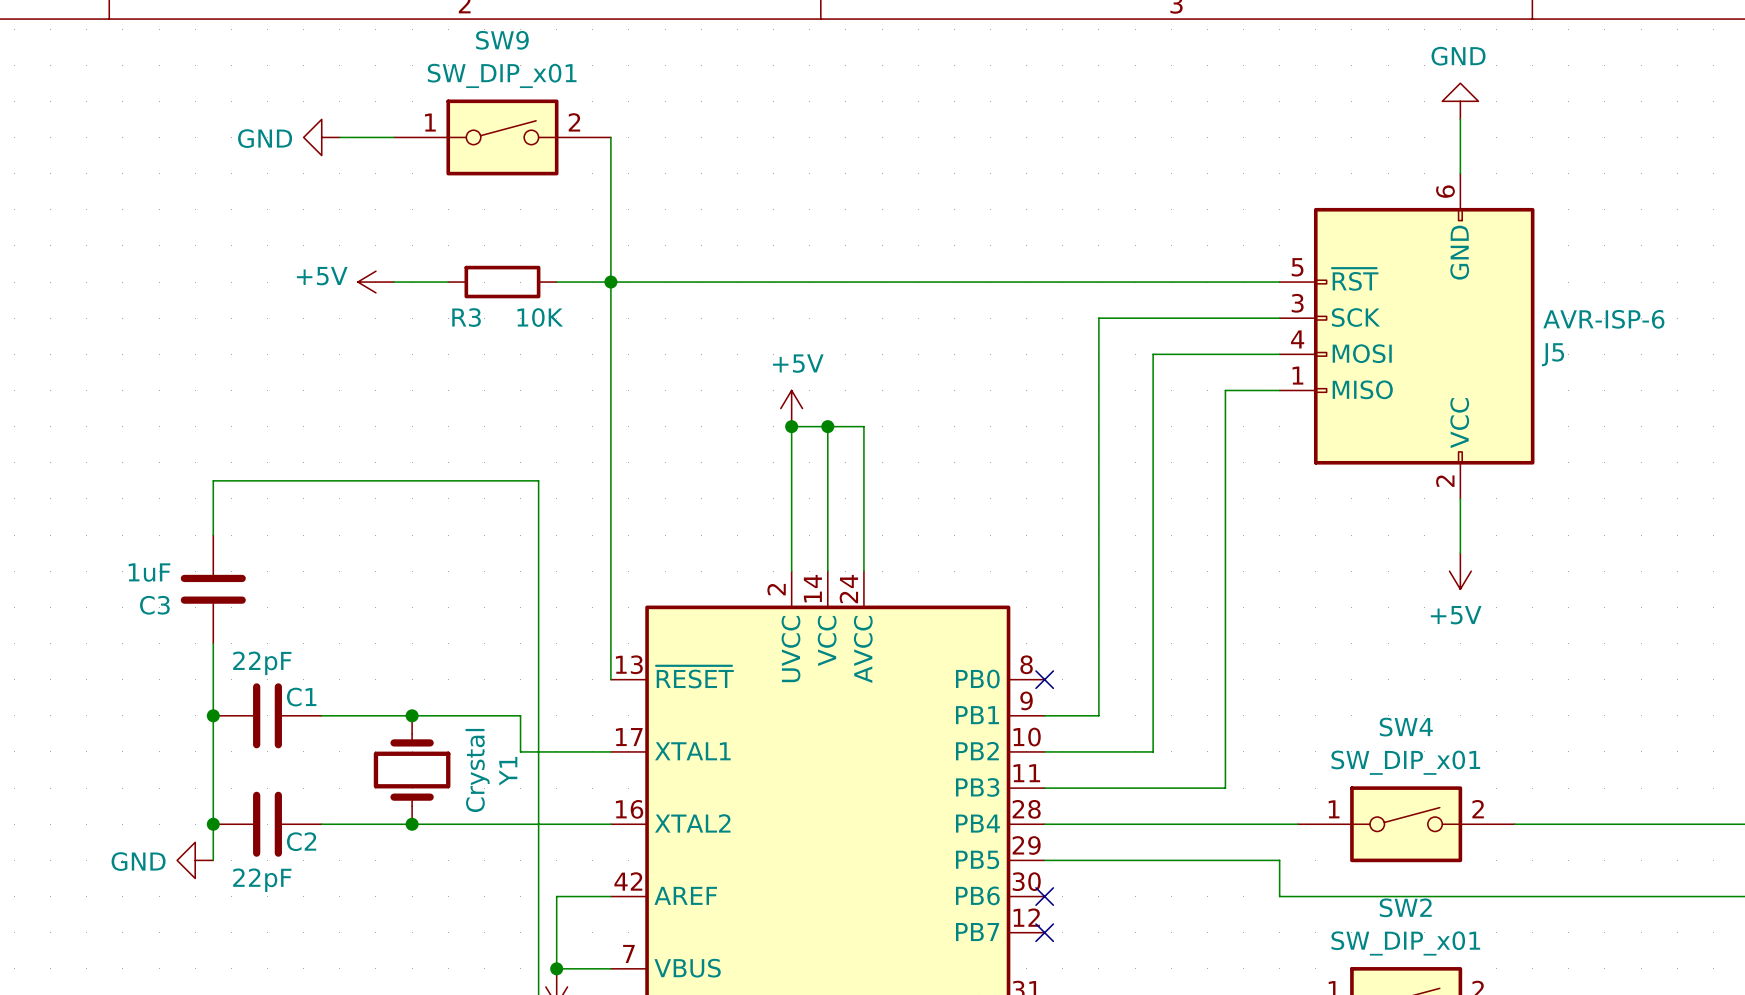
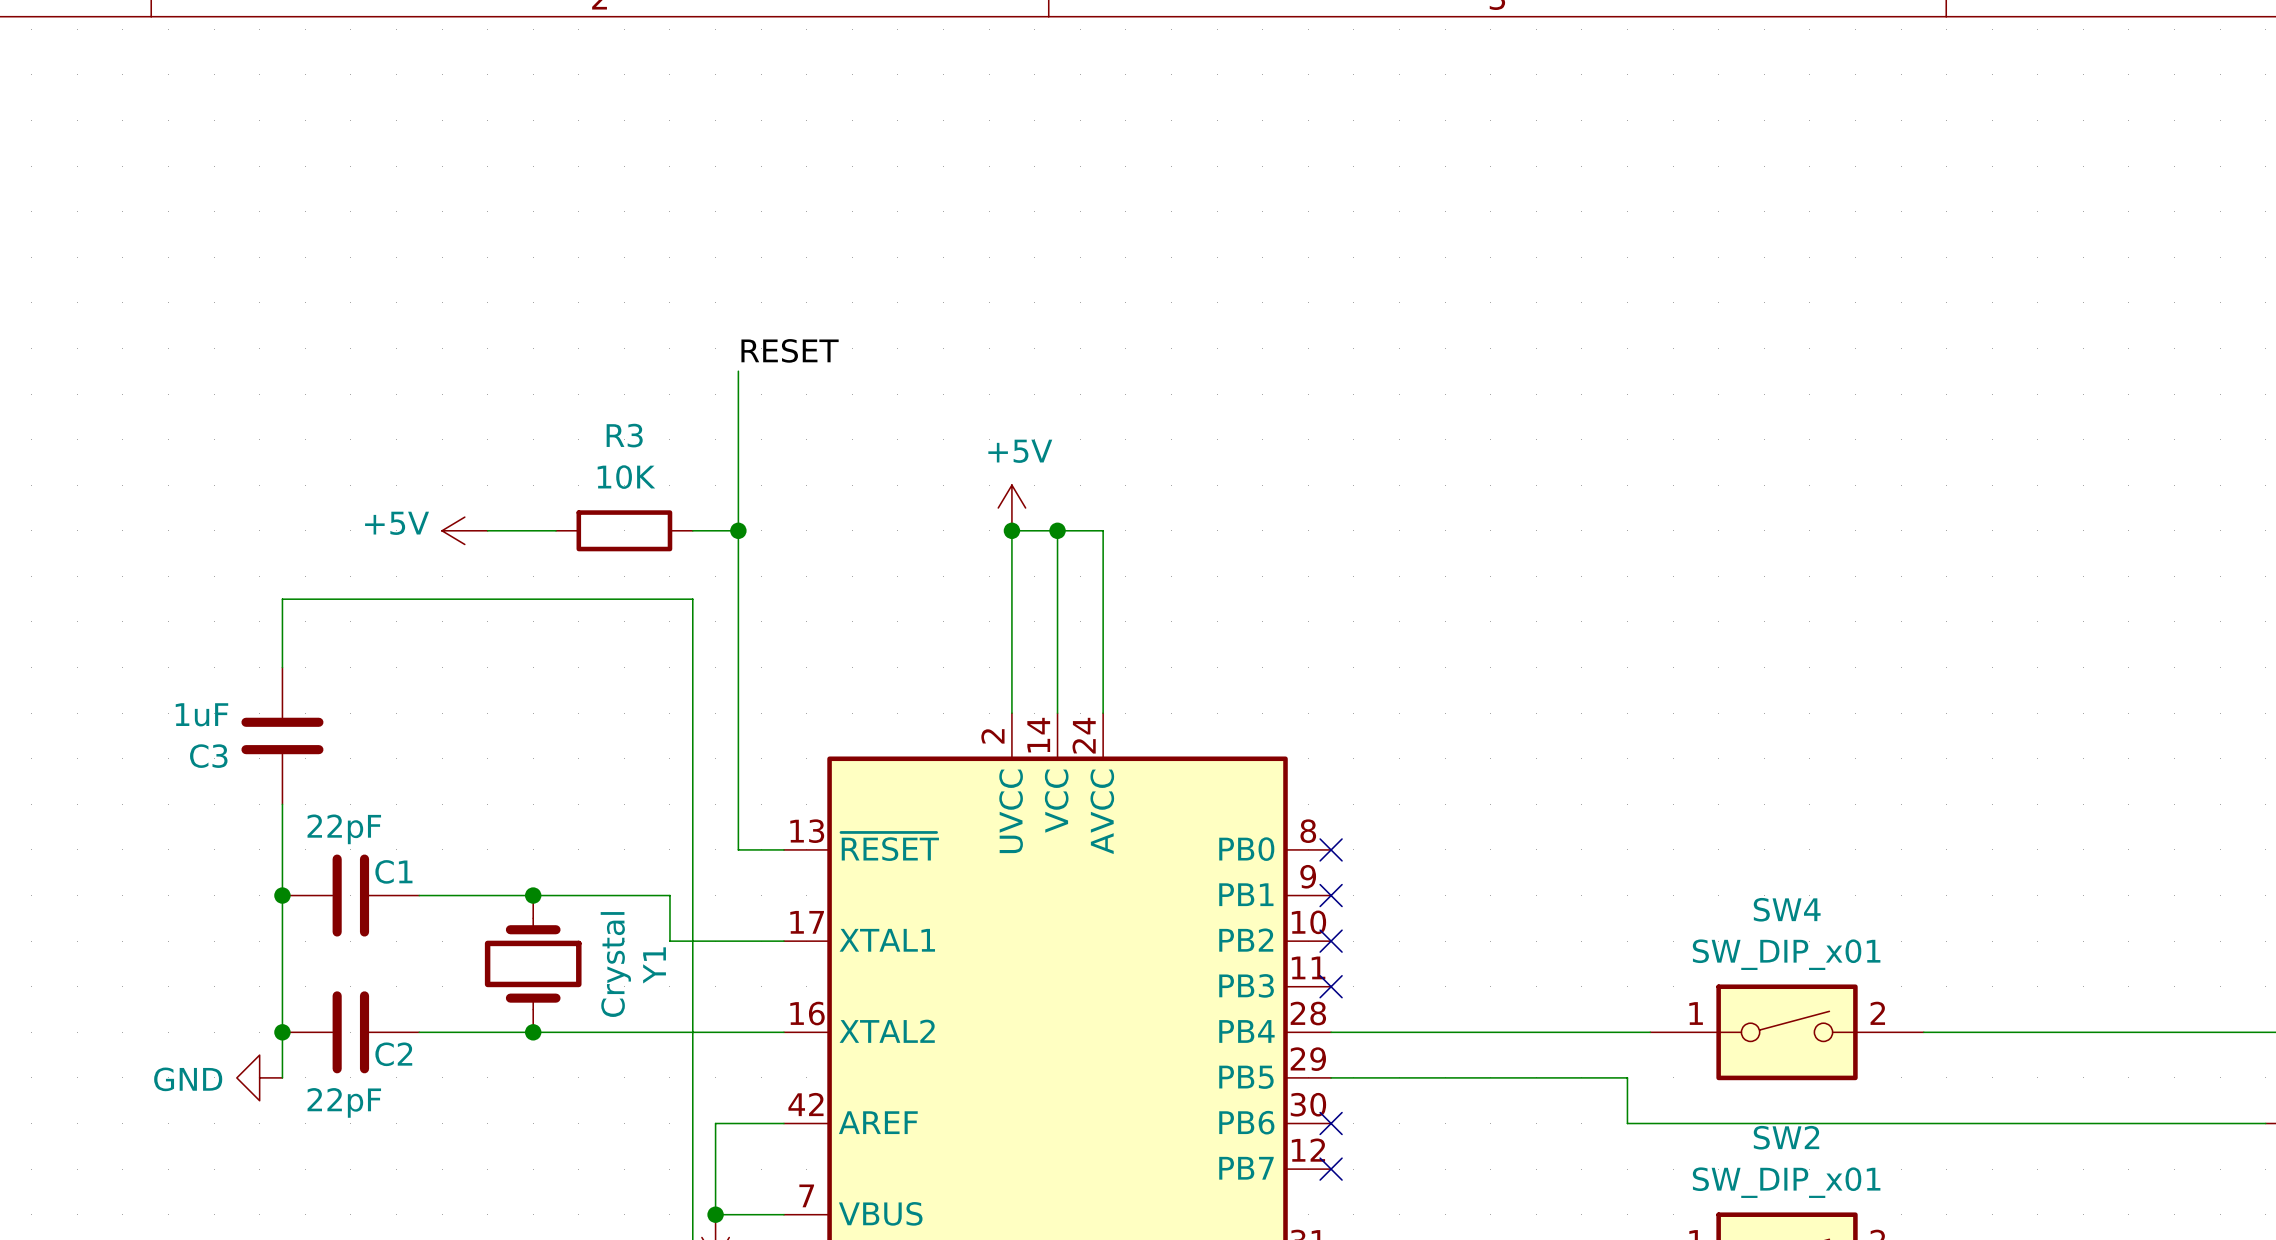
power symbol: GND (1460, 101) -> none
wire: (1460, 119) (1460, 173) -> none
power symbol: GND (321, 137) -> none
wire: (339, 137) (394, 137) -> none
SW9: SW_DIP_x01 (502, 137) -> none
wire: (610, 137) (610, 679) -> (738, 371) (738, 849) (783, 849)
power symbol position: +5V (375, 282) -> +5V (464, 530)
wire: (394, 282) (448, 282) -> (487, 530) (556, 530)
R3 position: (502, 282) -> (624, 530)
wire: (556, 282) (1279, 282) -> none
junction: (610, 282) -> none
label: none -> RESET (790, 350)
R3 name position: R3 (466, 317) -> R3 (624, 435)
R3 value position: 10K (540, 317) -> 10K (626, 477)
wire: (1279, 318) (1098, 318) (1098, 715) (1044, 715) -> none
J5: AVR-ISP-6 (1407, 336) -> none
wire: (1279, 354) (1153, 354) (1153, 751) (1044, 751) -> none
wire: (1279, 390) (1225, 390) (1225, 788) (1044, 788) -> none
wire: none -> (692, 530) (738, 530)
junction: none -> (738, 530)
wire: (1460, 498) (1460, 553) -> none
power symbol: +5V (1460, 571) -> none
no-connect mark: none -> (1331, 895)
no-connect mark: none -> (1331, 941)
no-connect mark: none -> (1331, 986)

